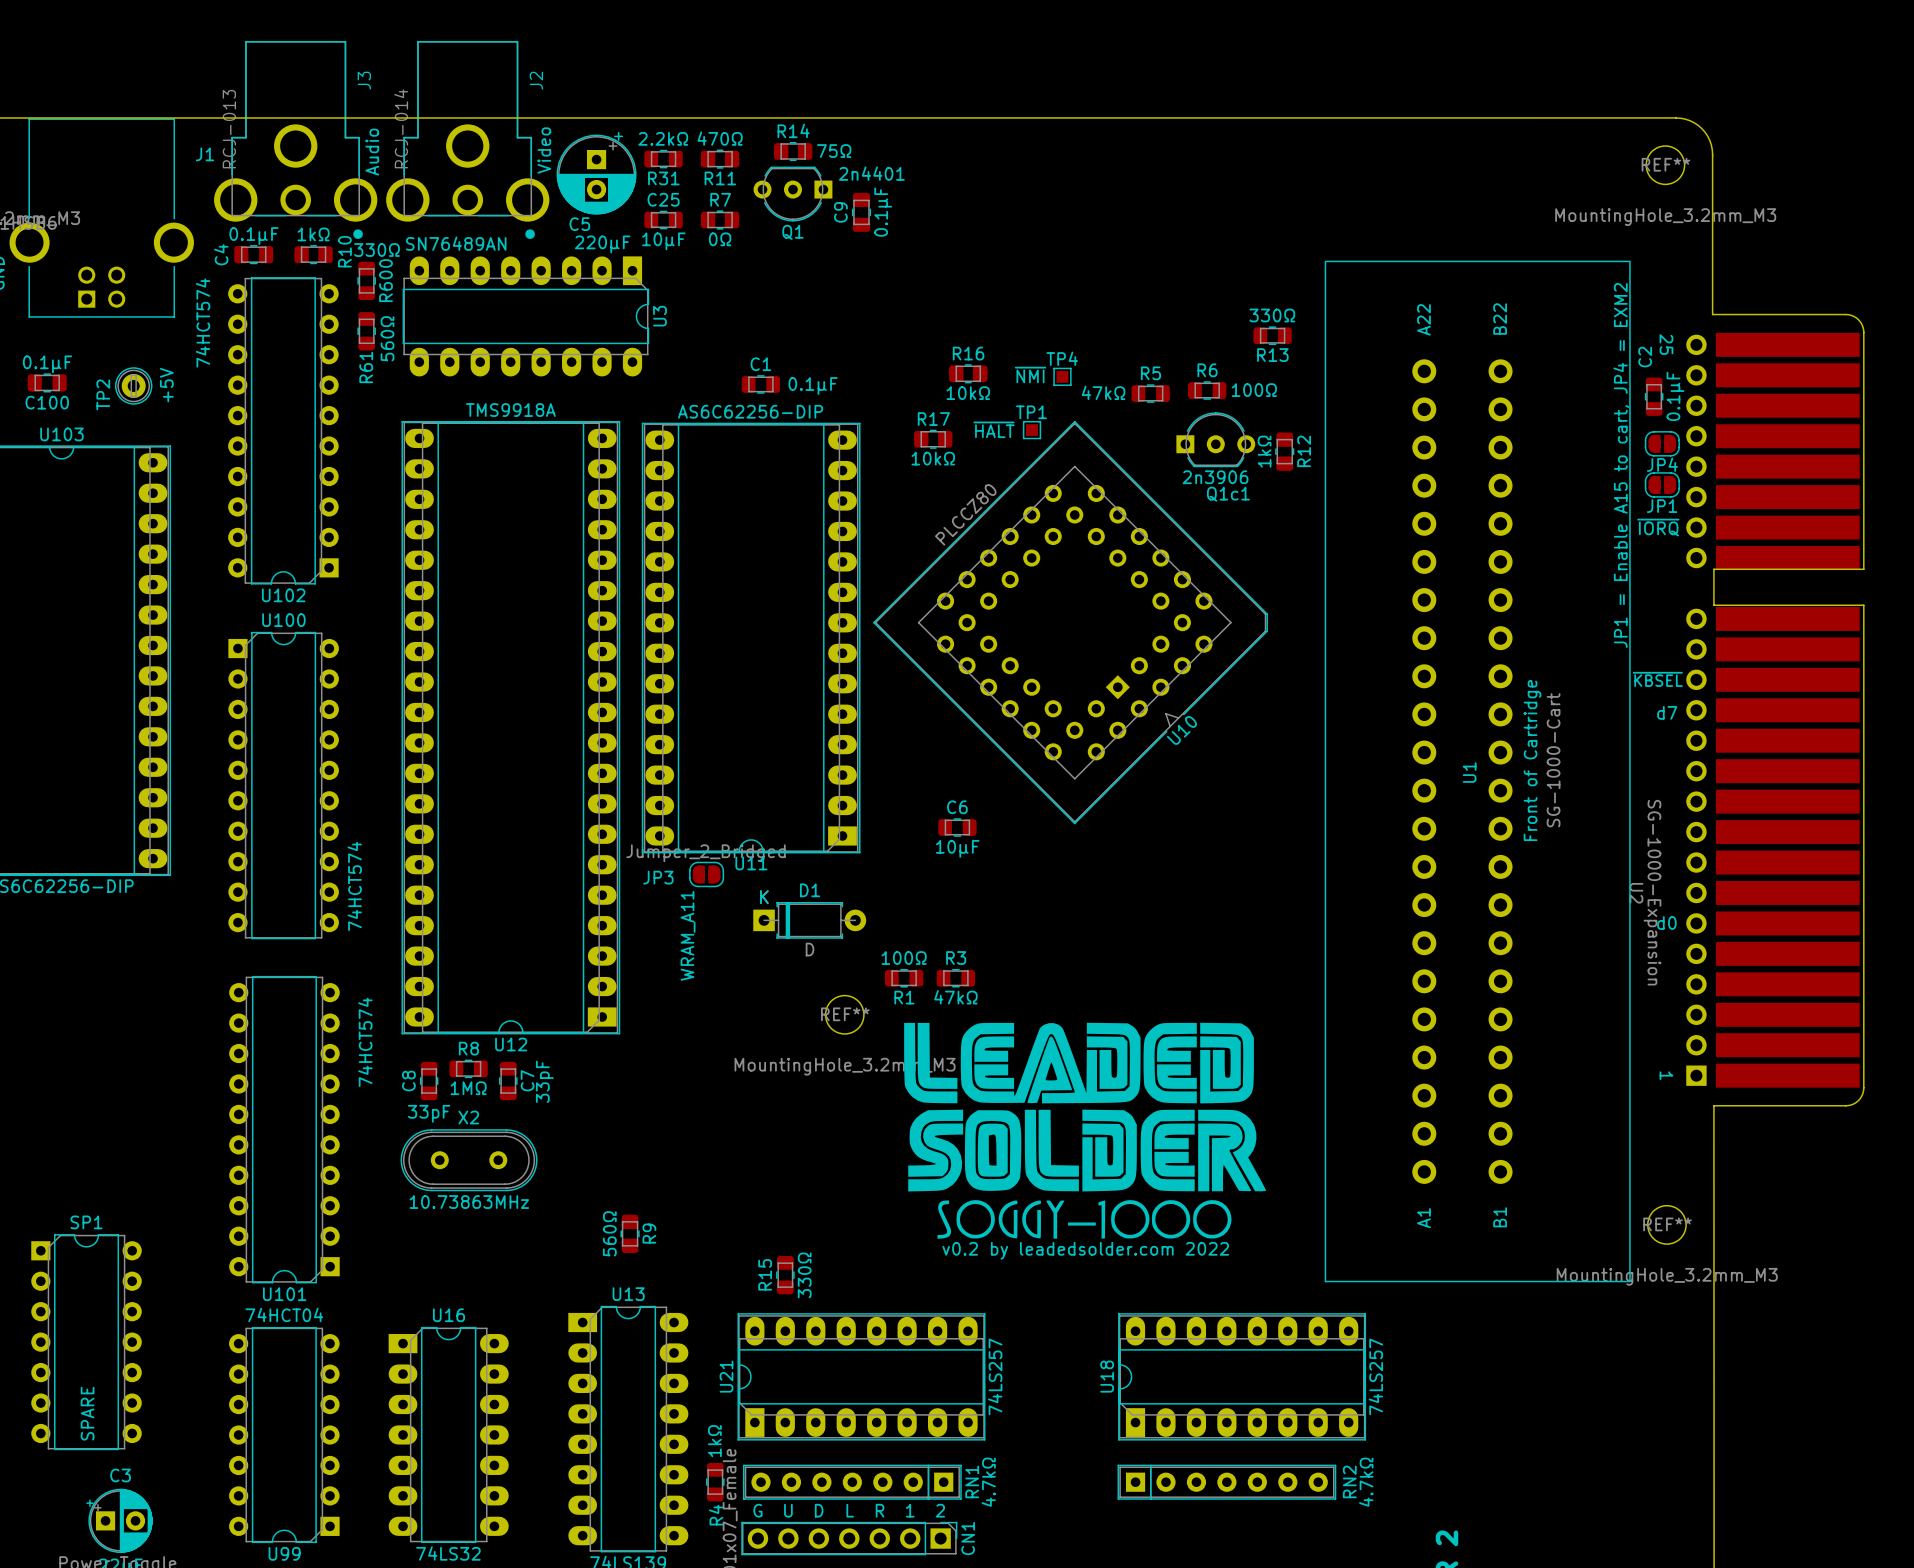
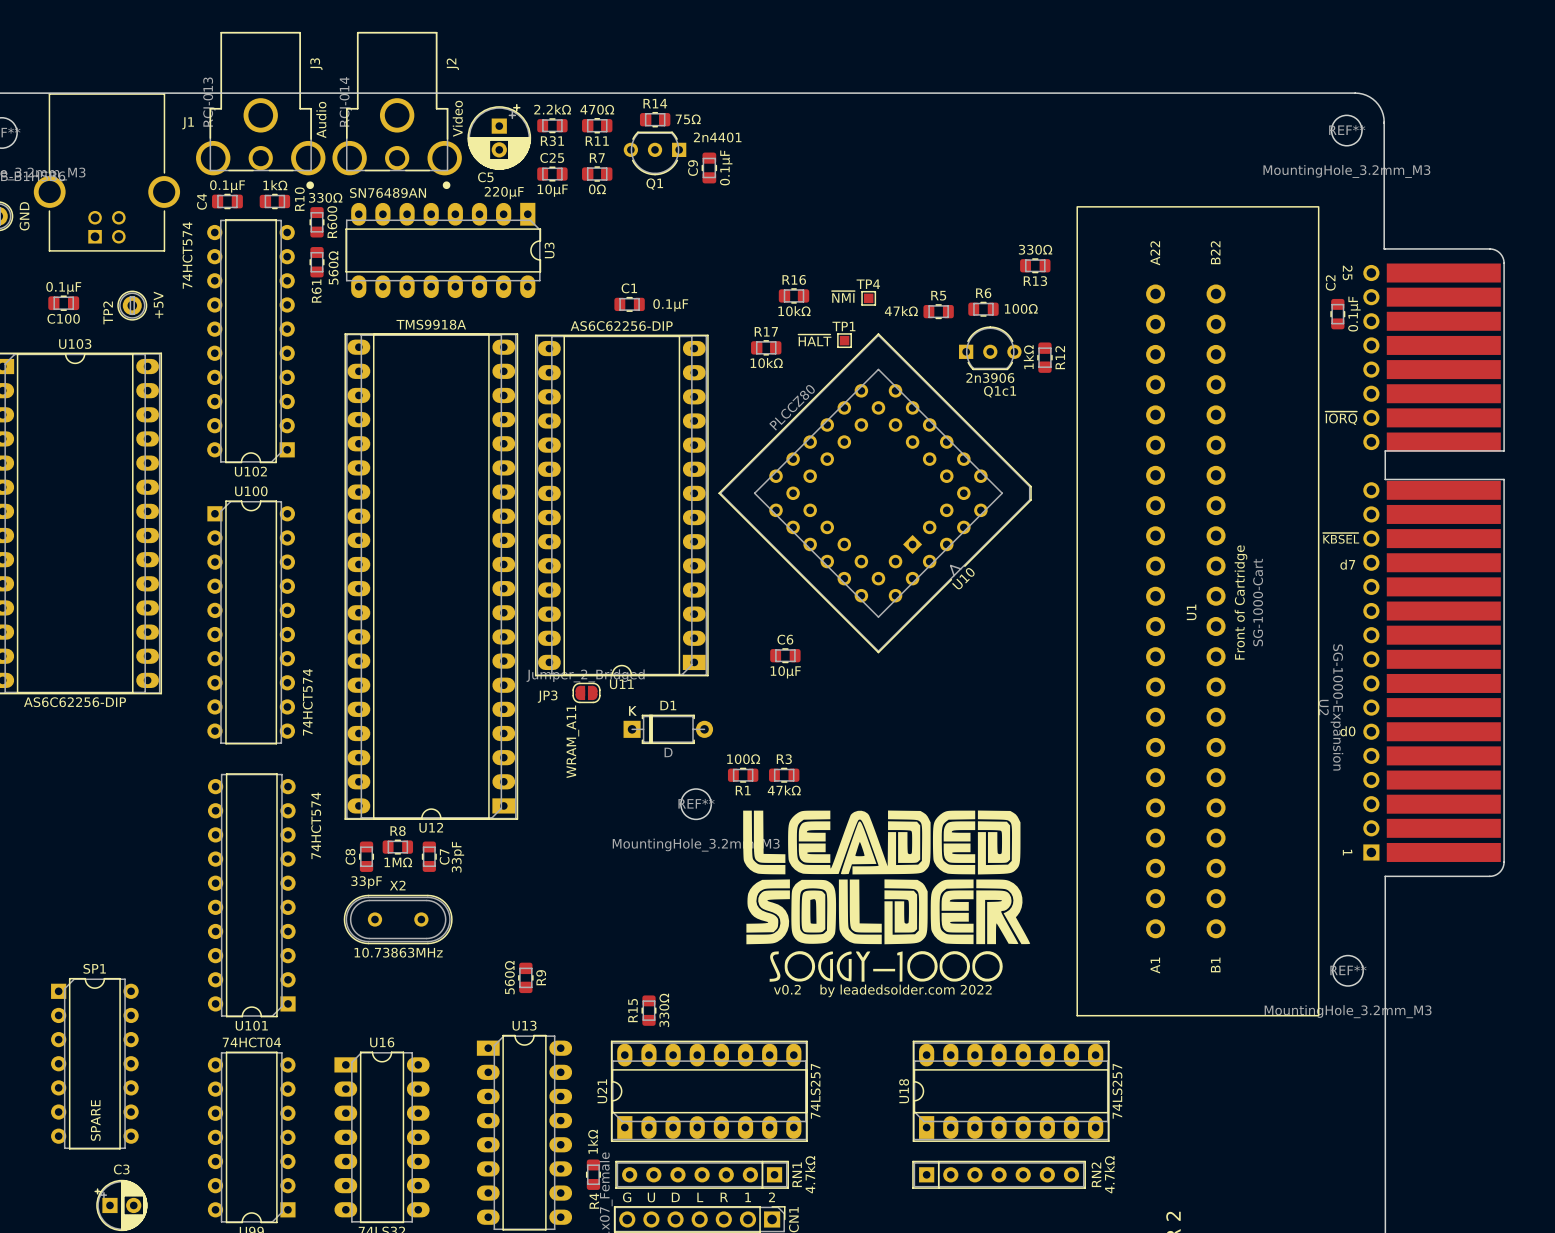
JP4: (1662, 443) -> none
text: JP1 = Enable A15 to cart, JP4 = EXM2 (1621, 465) -> none
JP1: (1662, 484) -> none

